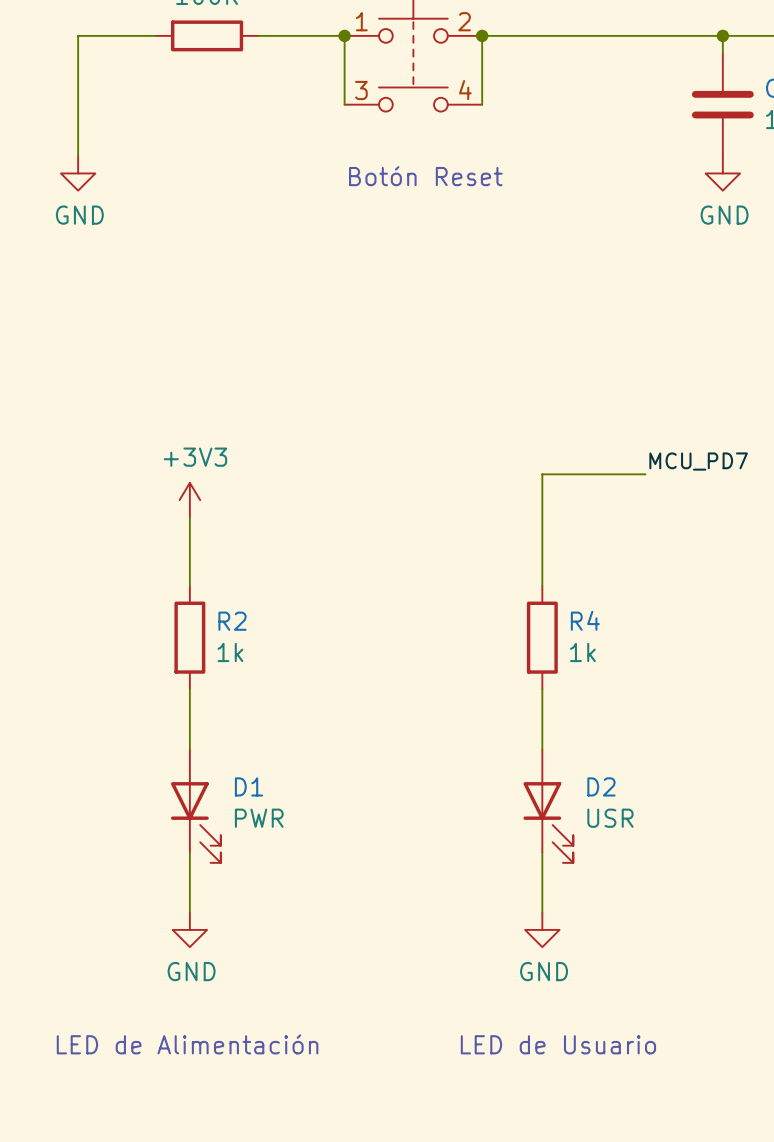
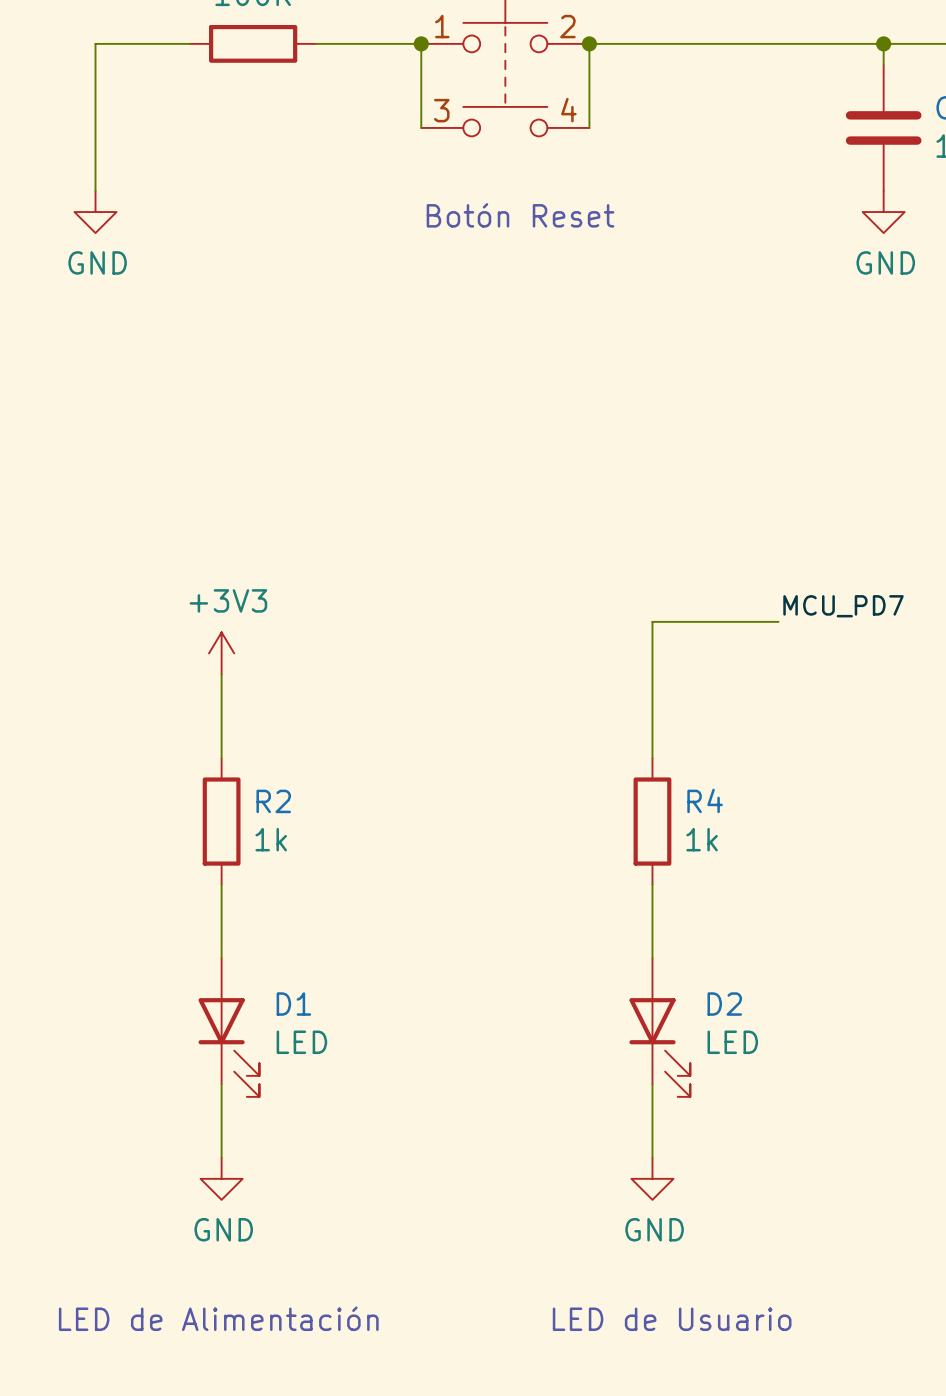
label position: MCU_PD7 (698, 461) -> MCU_PD7 (843, 606)
wire: (645, 474) (542, 474) (542, 586) -> (778, 621) (652, 621) (652, 758)
power symbol position: +3V3 (189, 500) -> +3V3 (221, 653)
wire: (189, 517) (189, 586) -> (221, 674) (221, 758)
R2 position: (189, 637) -> (221, 821)
R4 position: (542, 637) -> (652, 821)
wire: (189, 689) (189, 749) -> (221, 884) (221, 958)
wire: (542, 689) (542, 749) -> (652, 884) (652, 958)
D1 position: (195, 806) -> (228, 1027)
D2 position: (548, 806) -> (659, 1027)
D1 value: PWR (259, 818) -> LED (301, 1042)
D2 value: USR (610, 818) -> LED (732, 1042)
wire: (189, 852) (189, 912) -> (221, 1084) (221, 1157)
wire: (542, 852) (542, 912) -> (652, 1084) (652, 1157)
power symbol position: GND (189, 929) -> GND (221, 1178)
power symbol position: GND (542, 929) -> GND (652, 1178)
text position: LED de Alimentación (187, 1044) -> LED de Alimentación (218, 1318)
text position: LED de Usuario (558, 1044) -> LED de Usuario (672, 1319)

